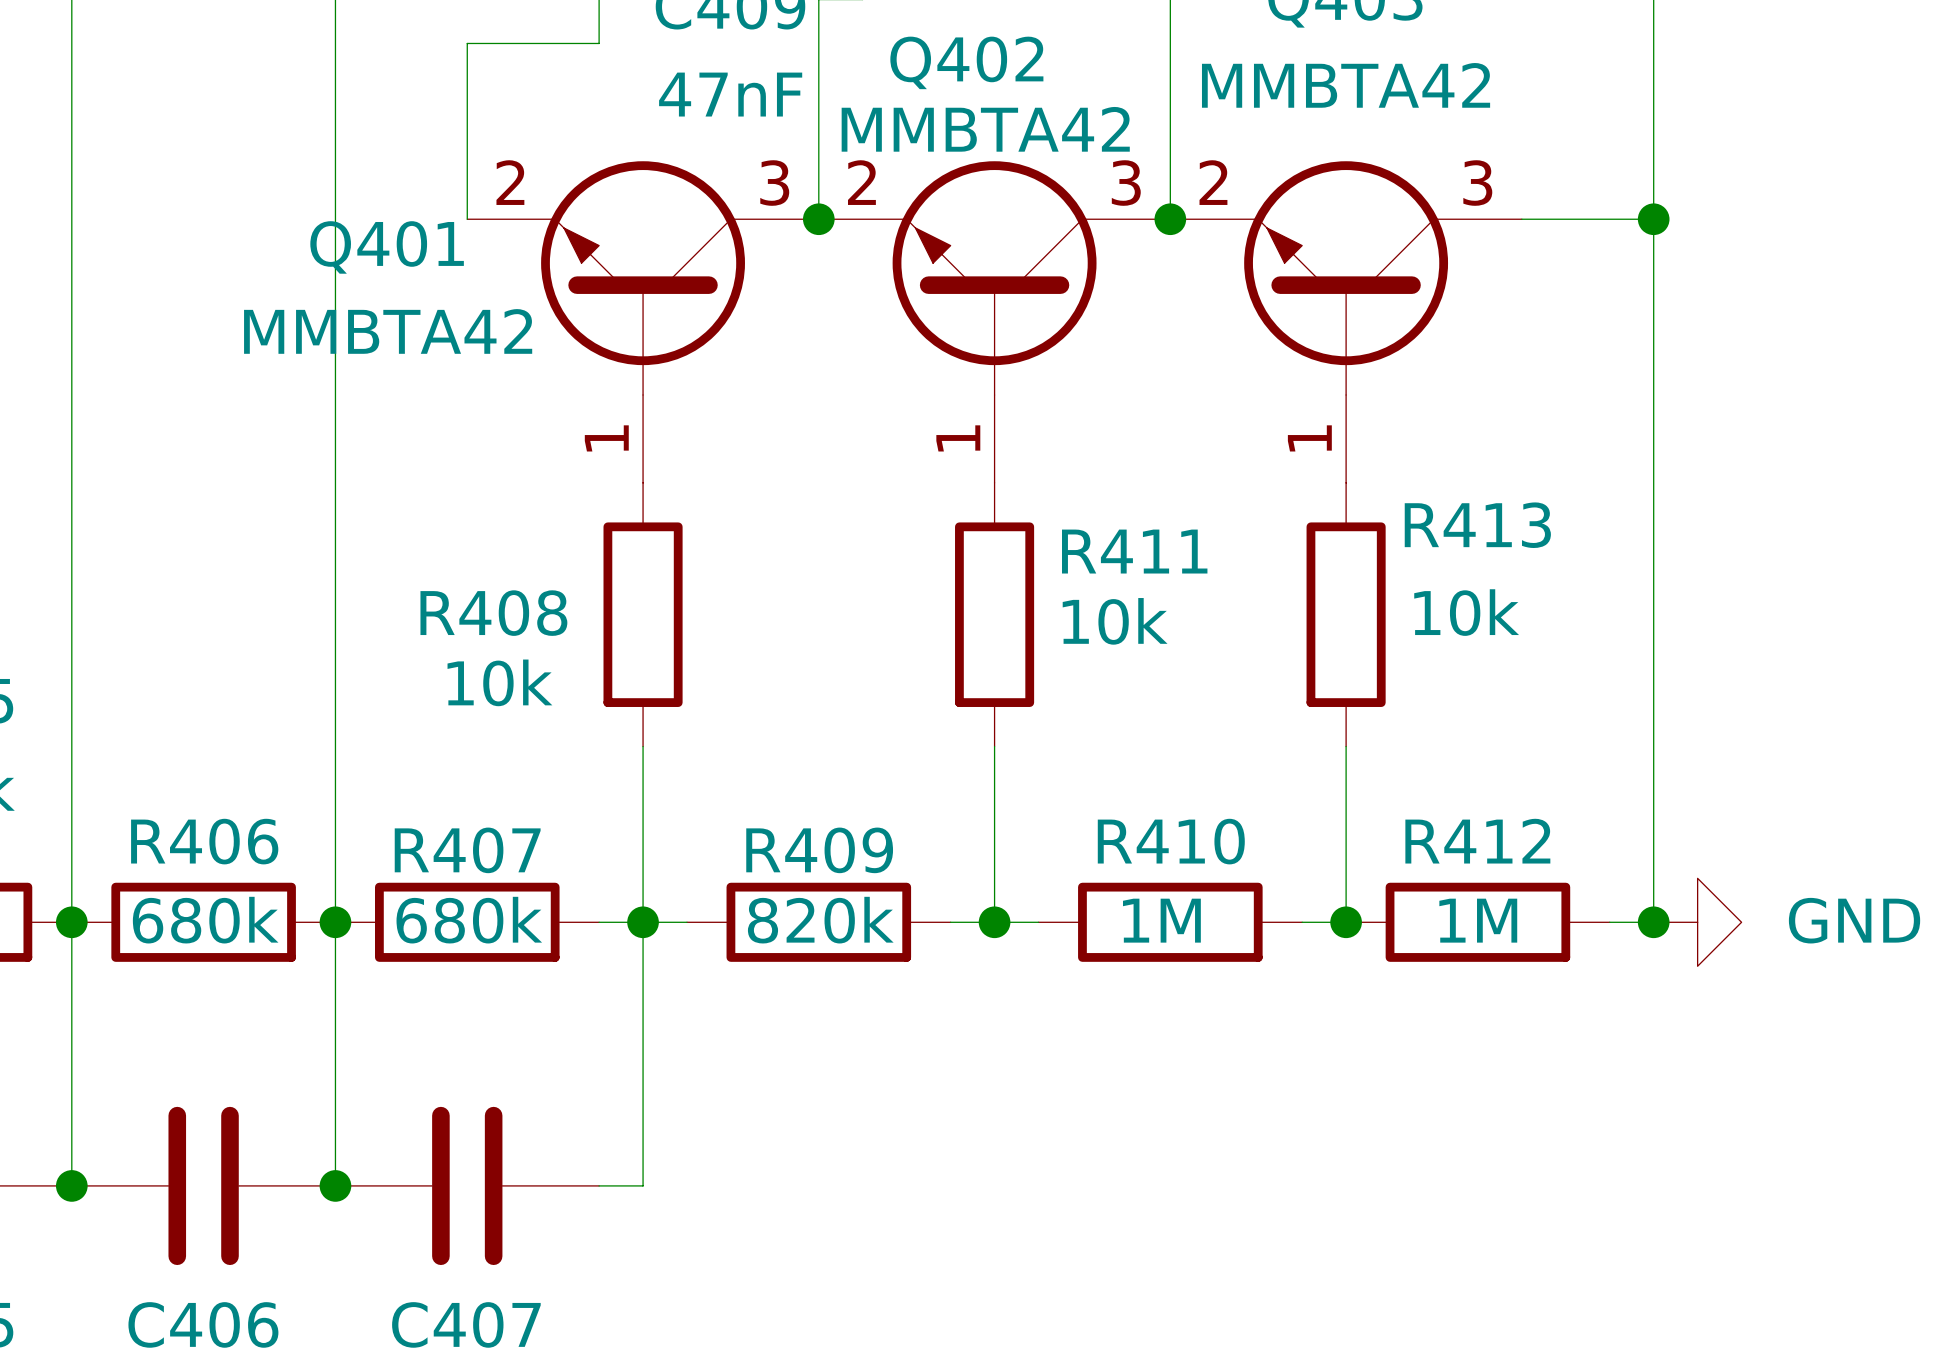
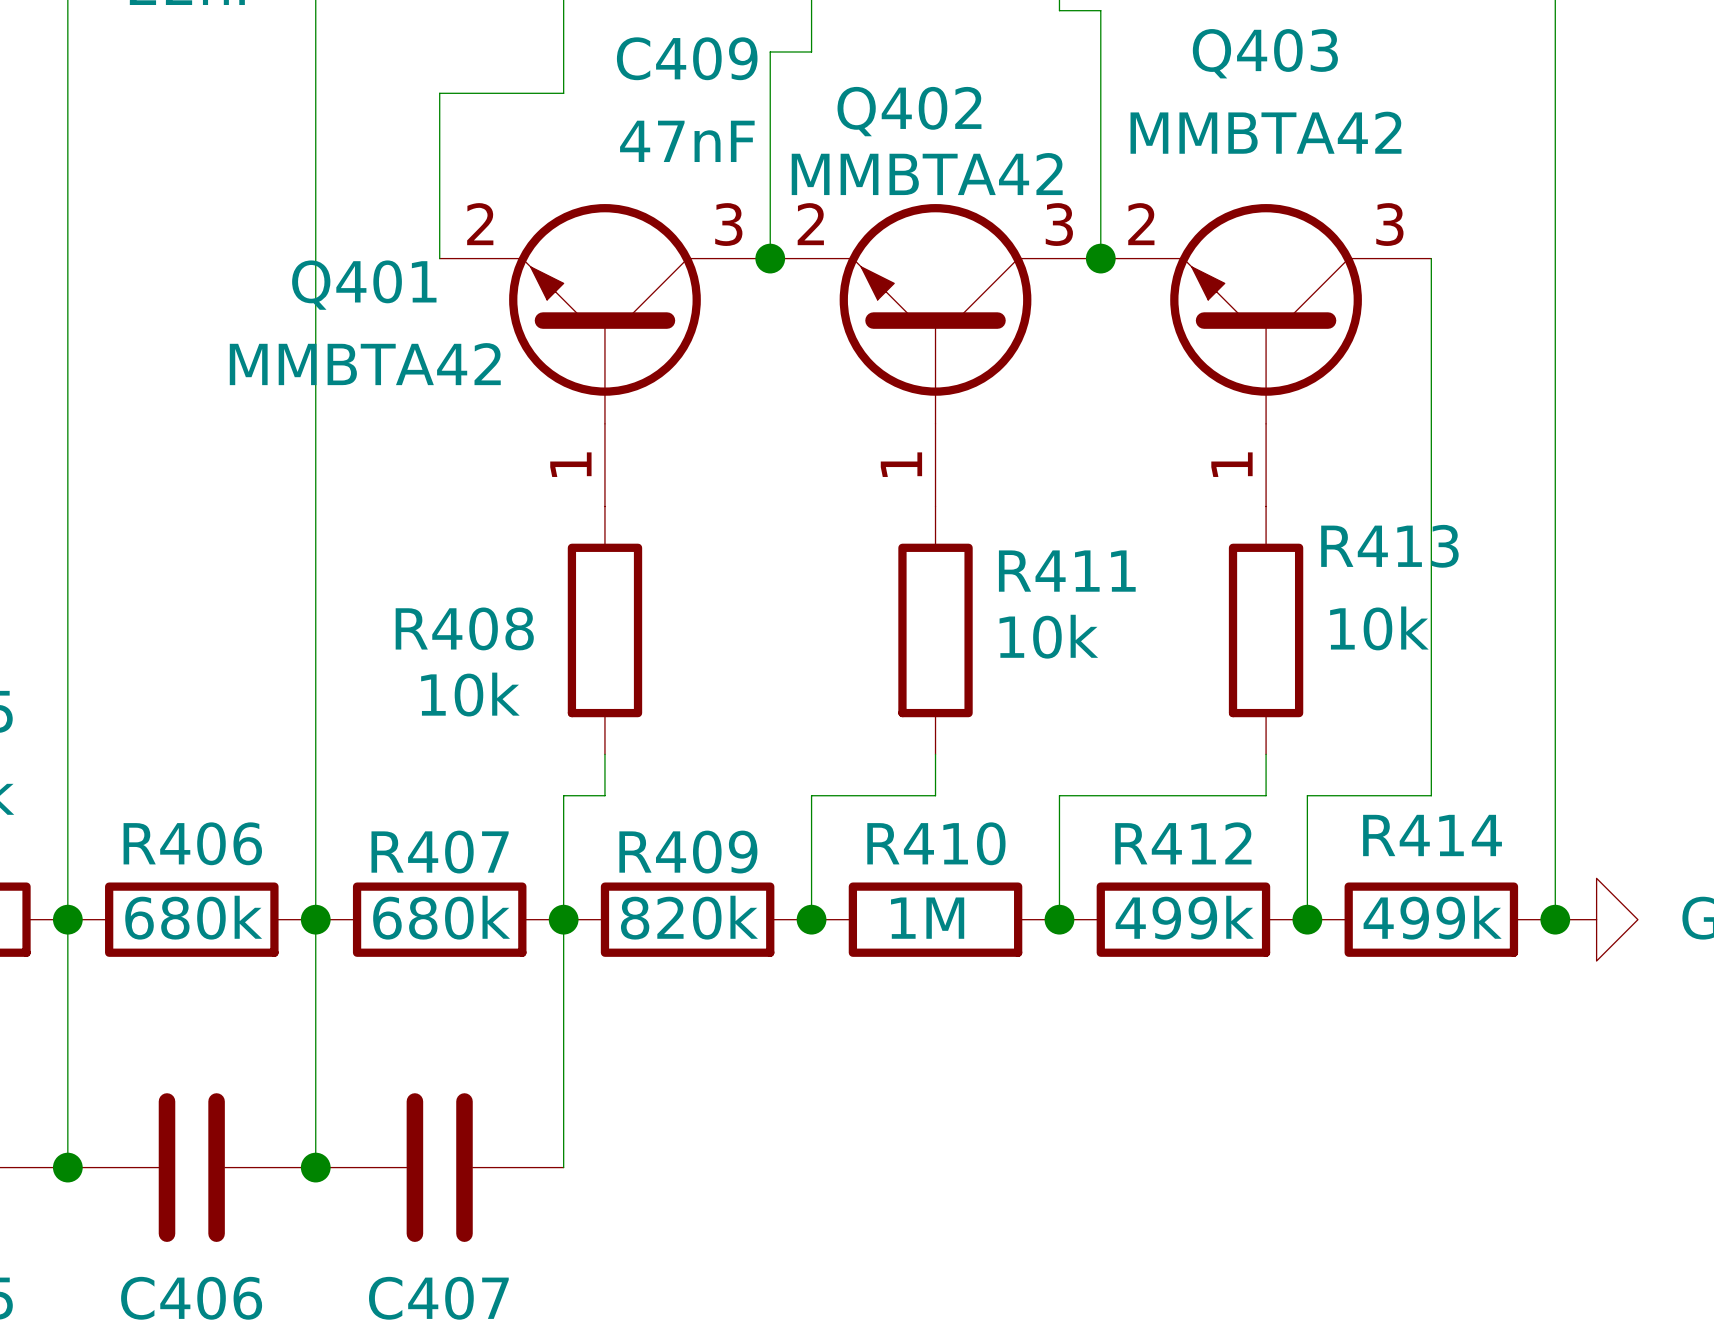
wire: (1521, 219) (1653, 219) -> (1431, 258) (1431, 795) (1307, 795) (1307, 919)
junction: (1653, 219) -> none
wire: (643, 790) (643, 1185) (599, 1185) -> (604, 795) (563, 795) (563, 1167)
wire: (994, 790) (994, 922) -> (935, 795) (811, 795) (811, 919)
wire: (1346, 790) (1346, 922) (1302, 922) -> (1266, 795) (1059, 795) (1059, 919)
R412 value: 1M (1478, 920) -> 499k (1184, 917)
junction position: (643, 922) -> (563, 919)
R409 position: (818, 922) -> (687, 919)
junction: none -> (811, 919)
wire: (950, 922) (1038, 922) -> none
junction: (994, 922) -> none
junction: none -> (1059, 919)
R410 position: (1170, 922) -> (935, 919)
junction position: (1346, 922) -> (1307, 919)
R412 position: (1477, 922) -> (1183, 919)
R414: none -> 499k (1431, 919)

